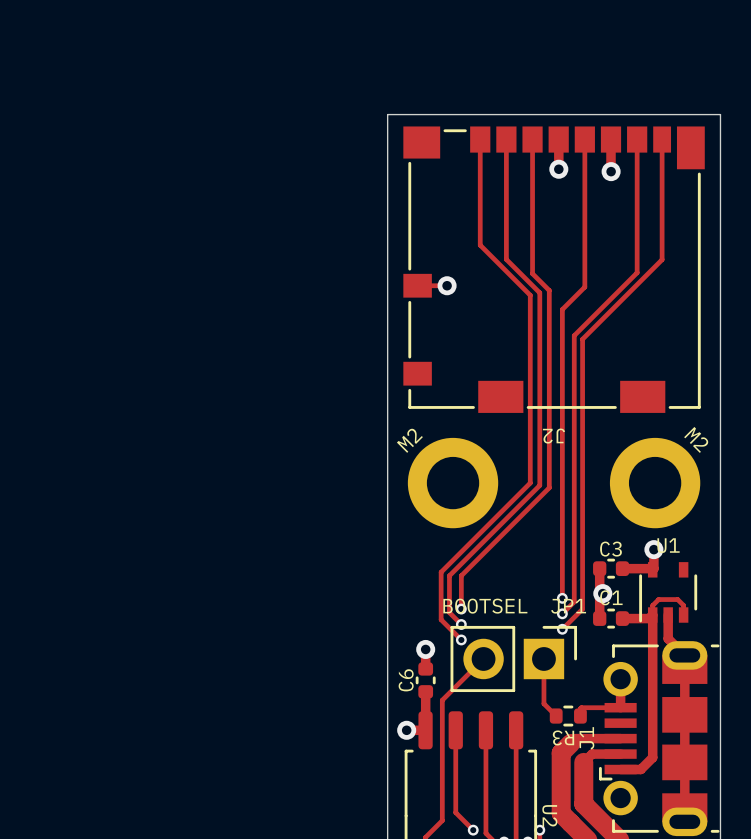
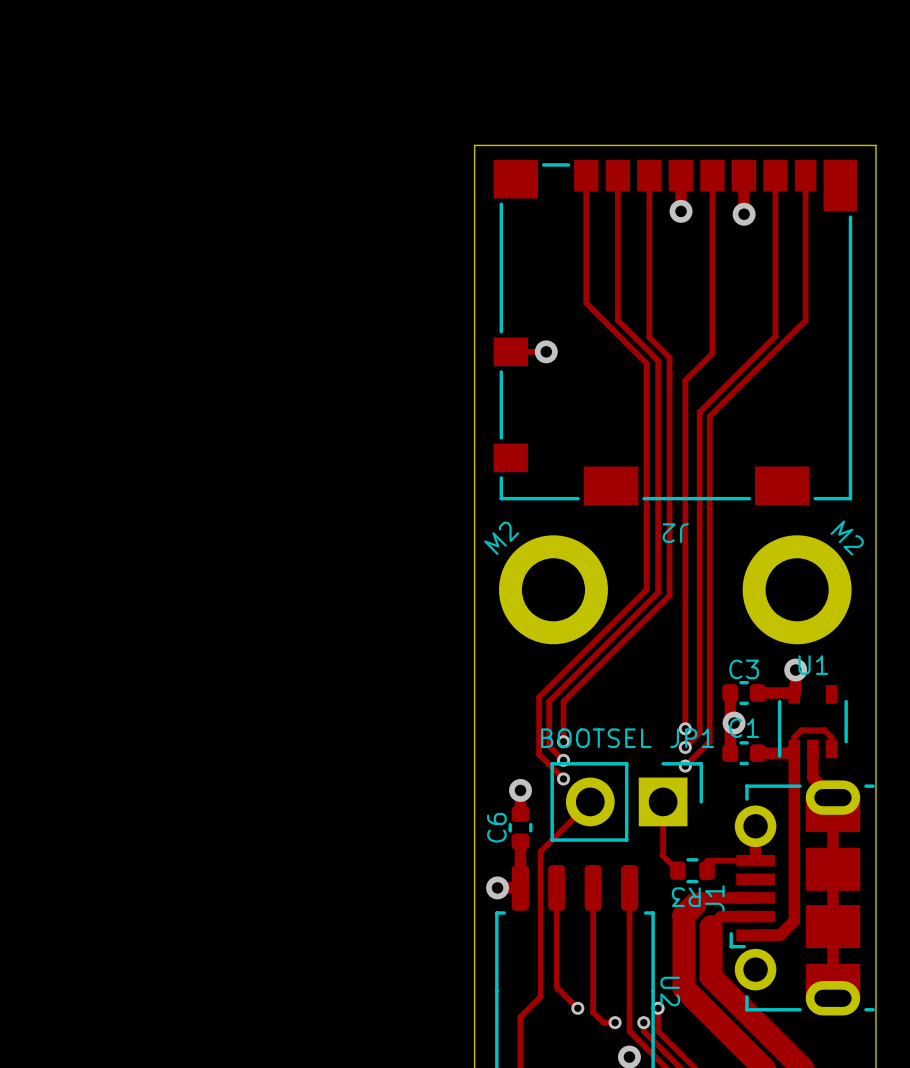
JP1 value: BOOTSEL (485, 606) -> none
text: none -> BOOTSEL (596, 738)

